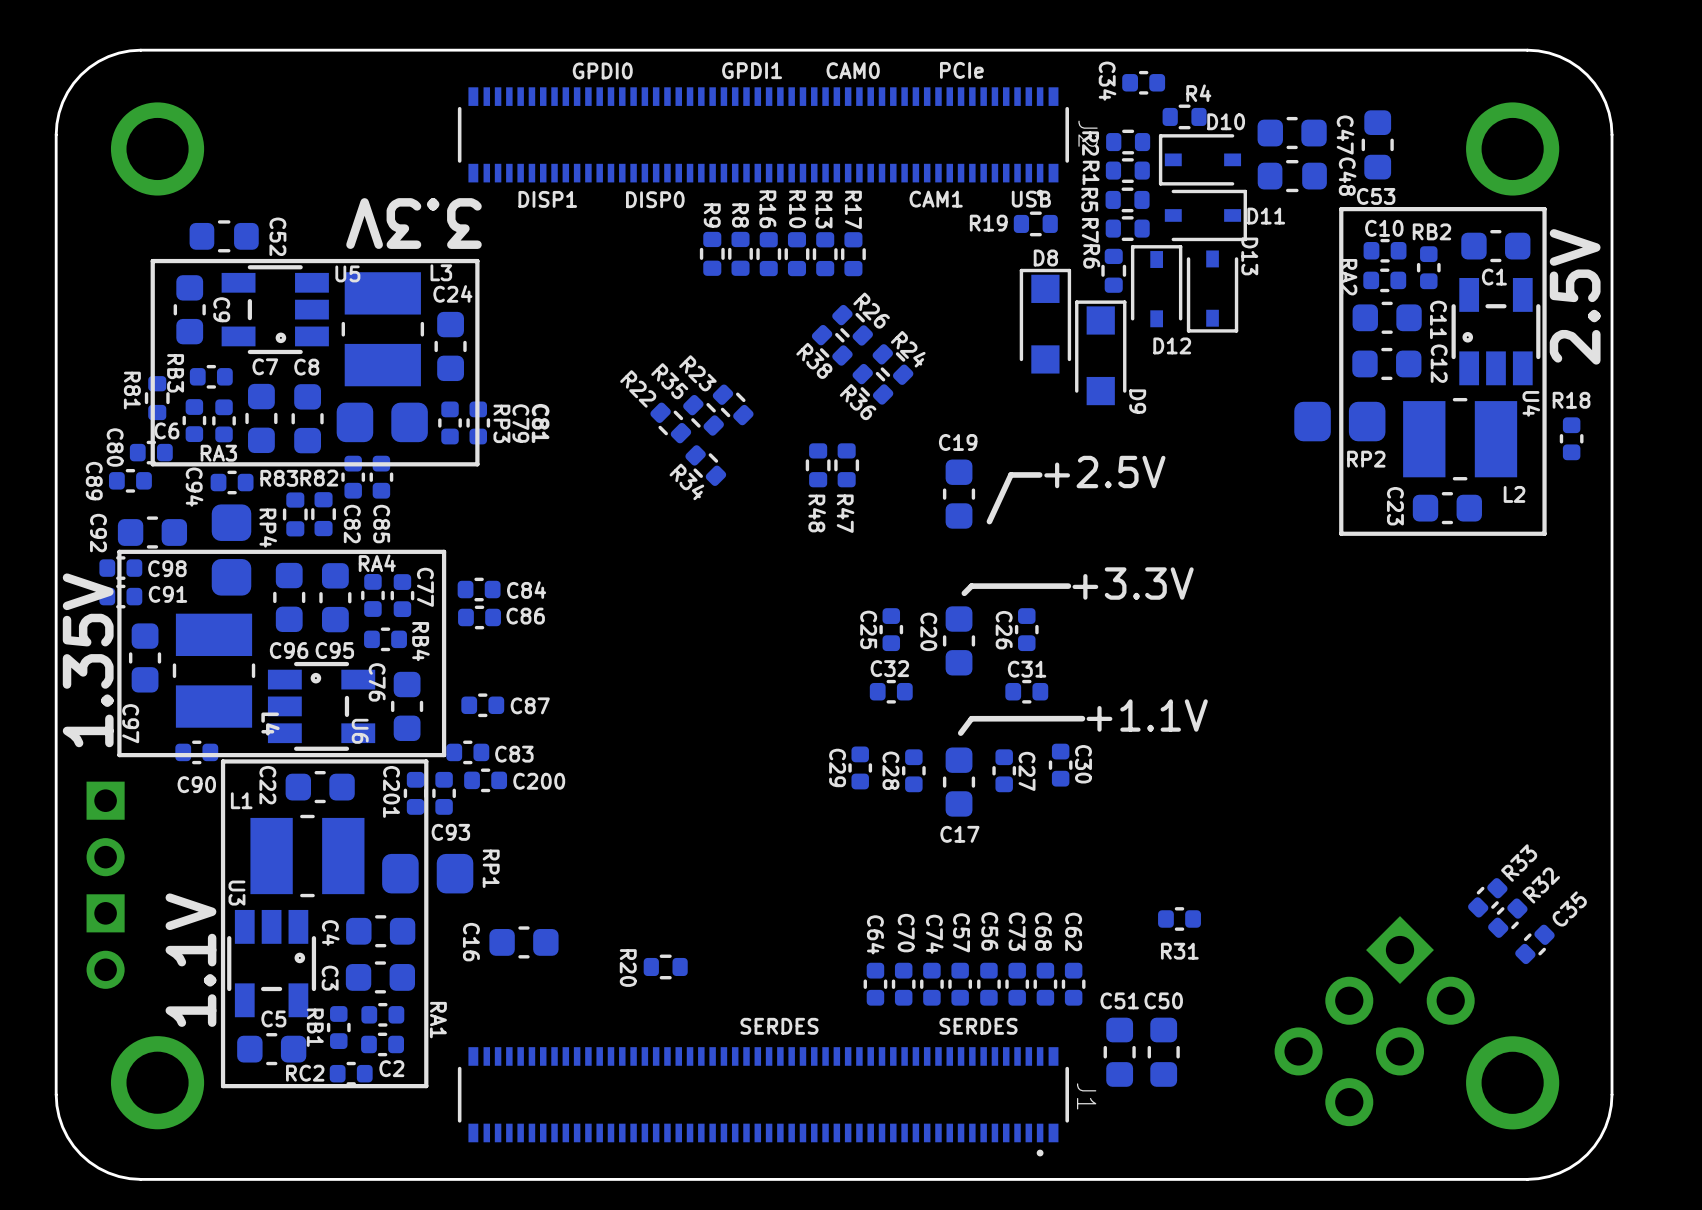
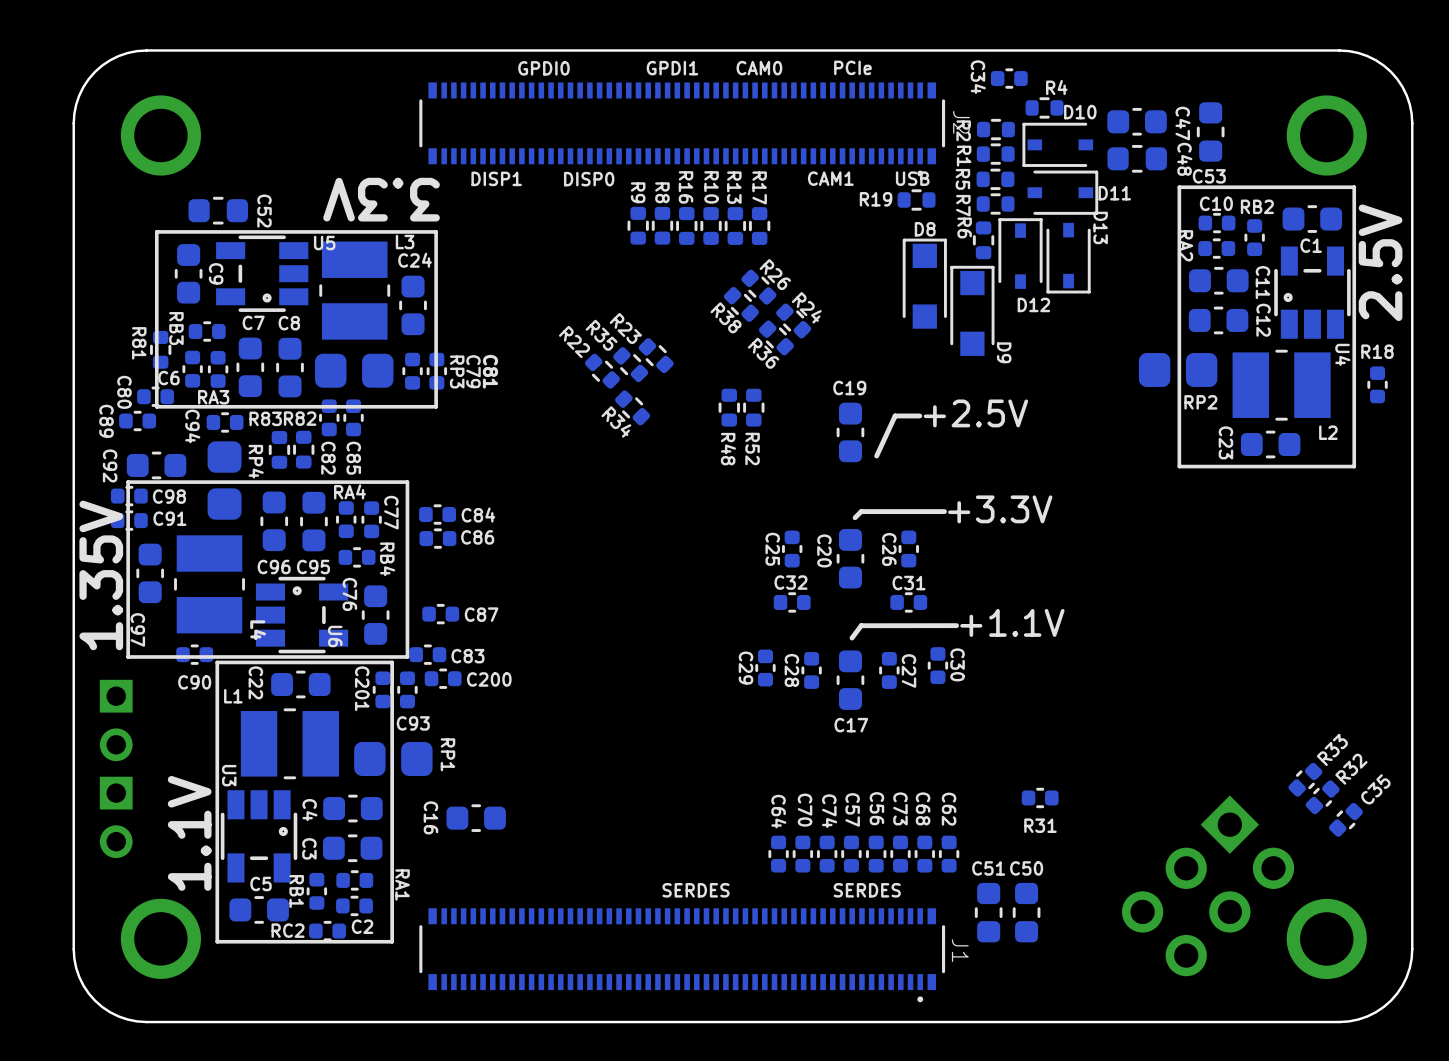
R47 name: R47 (845, 513) -> R52 (752, 448)
R20: (665, 966) -> none

